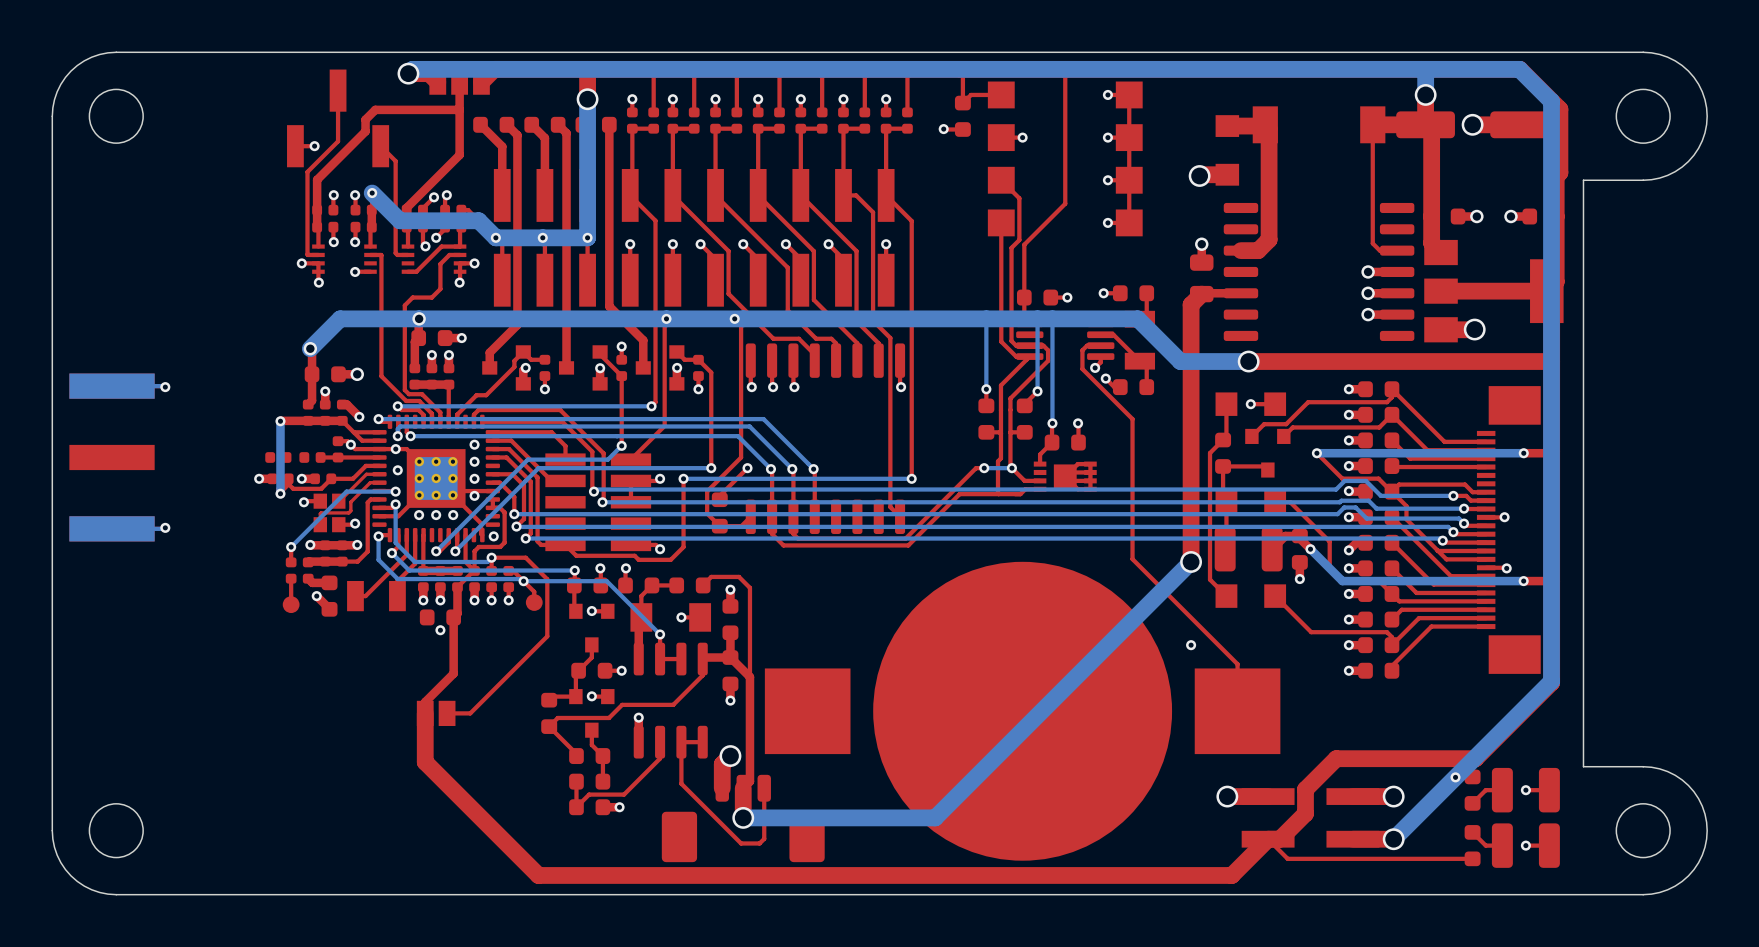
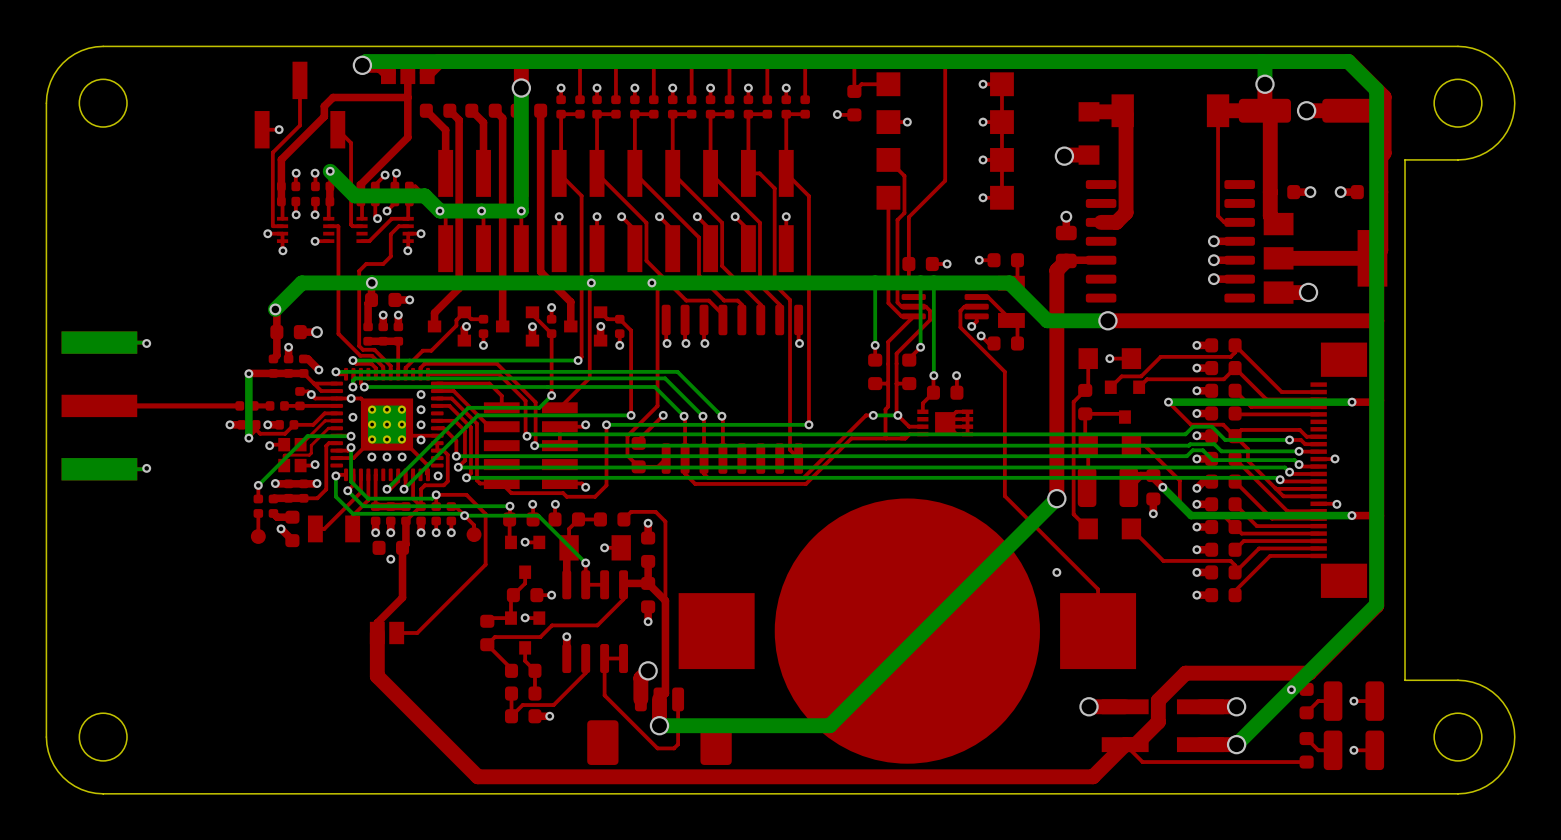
top track: none -> (239, 405) (99, 405)
top track: none -> (270, 405) (254, 405)

